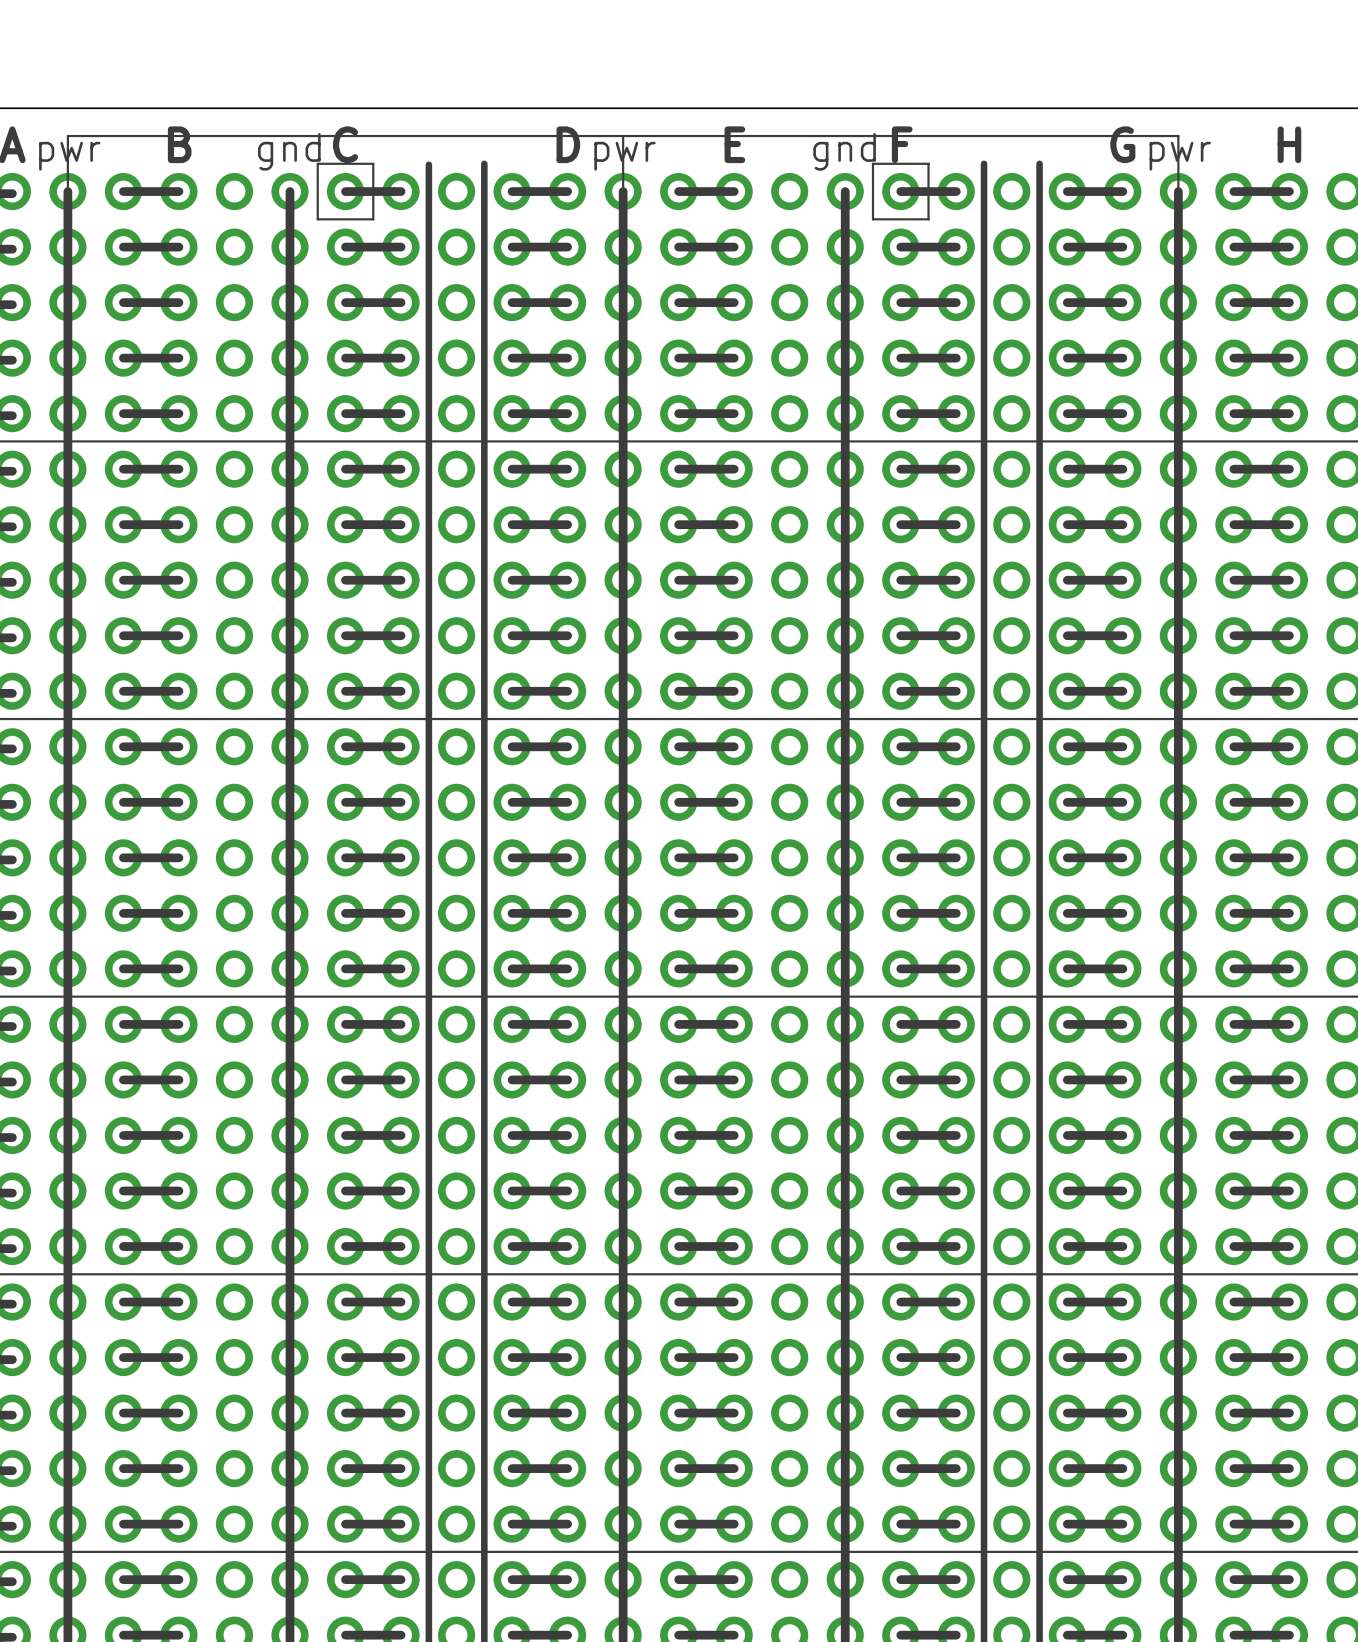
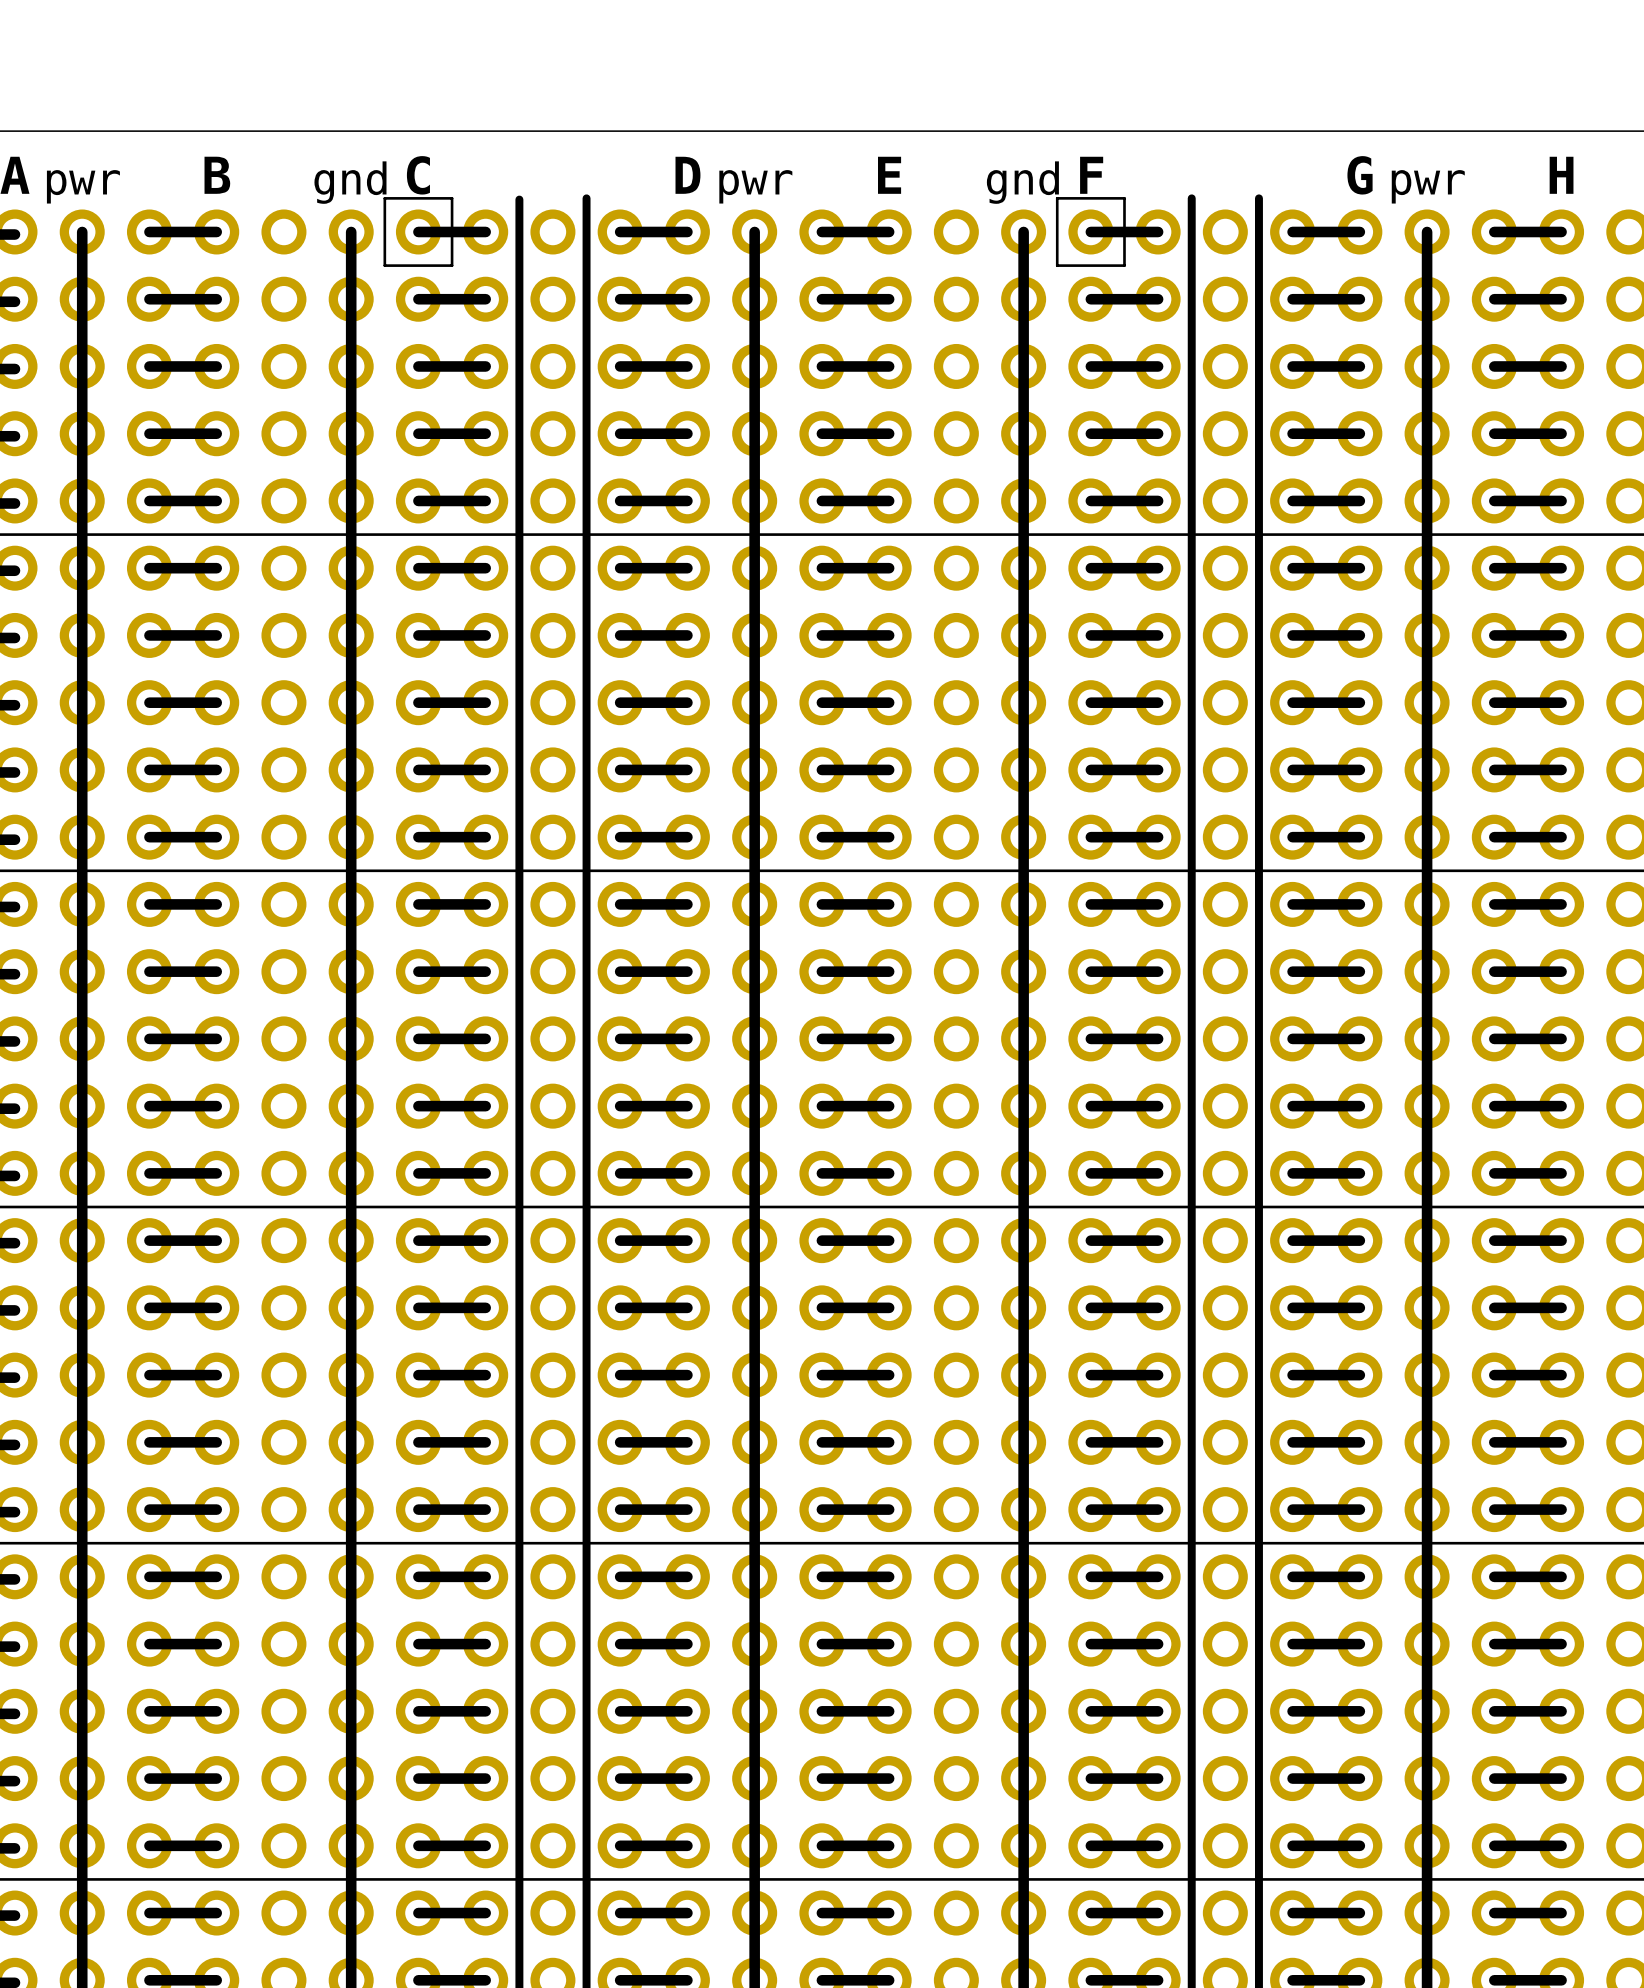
line: (623, 136) (623, 191) -> none
line: (1178, 191) (1178, 136) (67, 136) (67, 191) -> none

